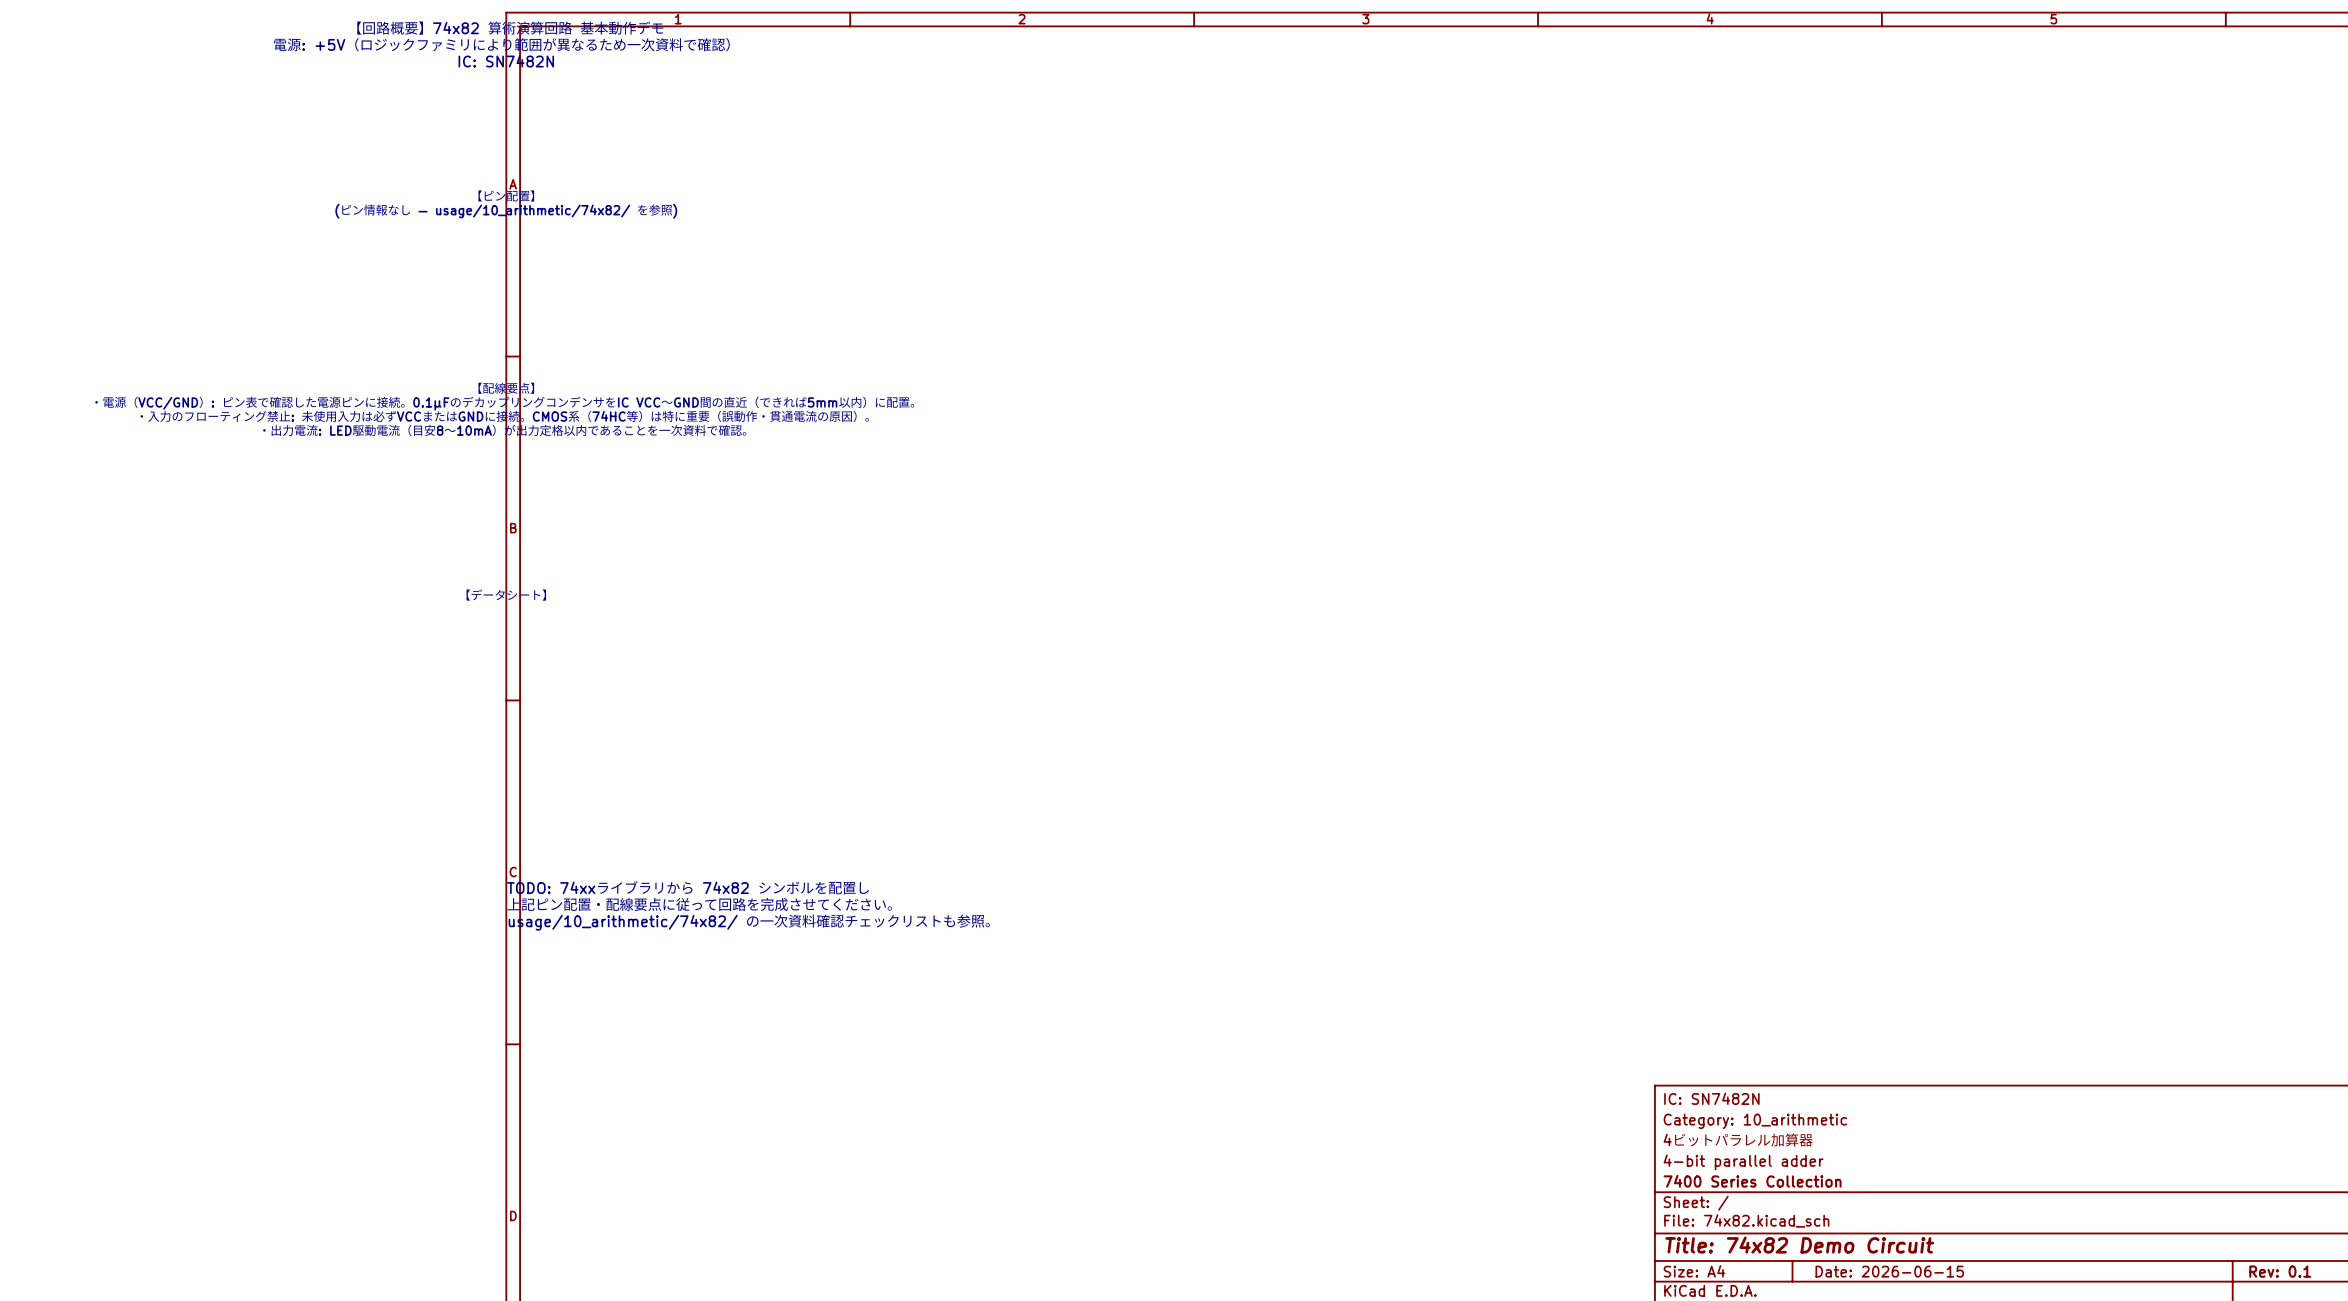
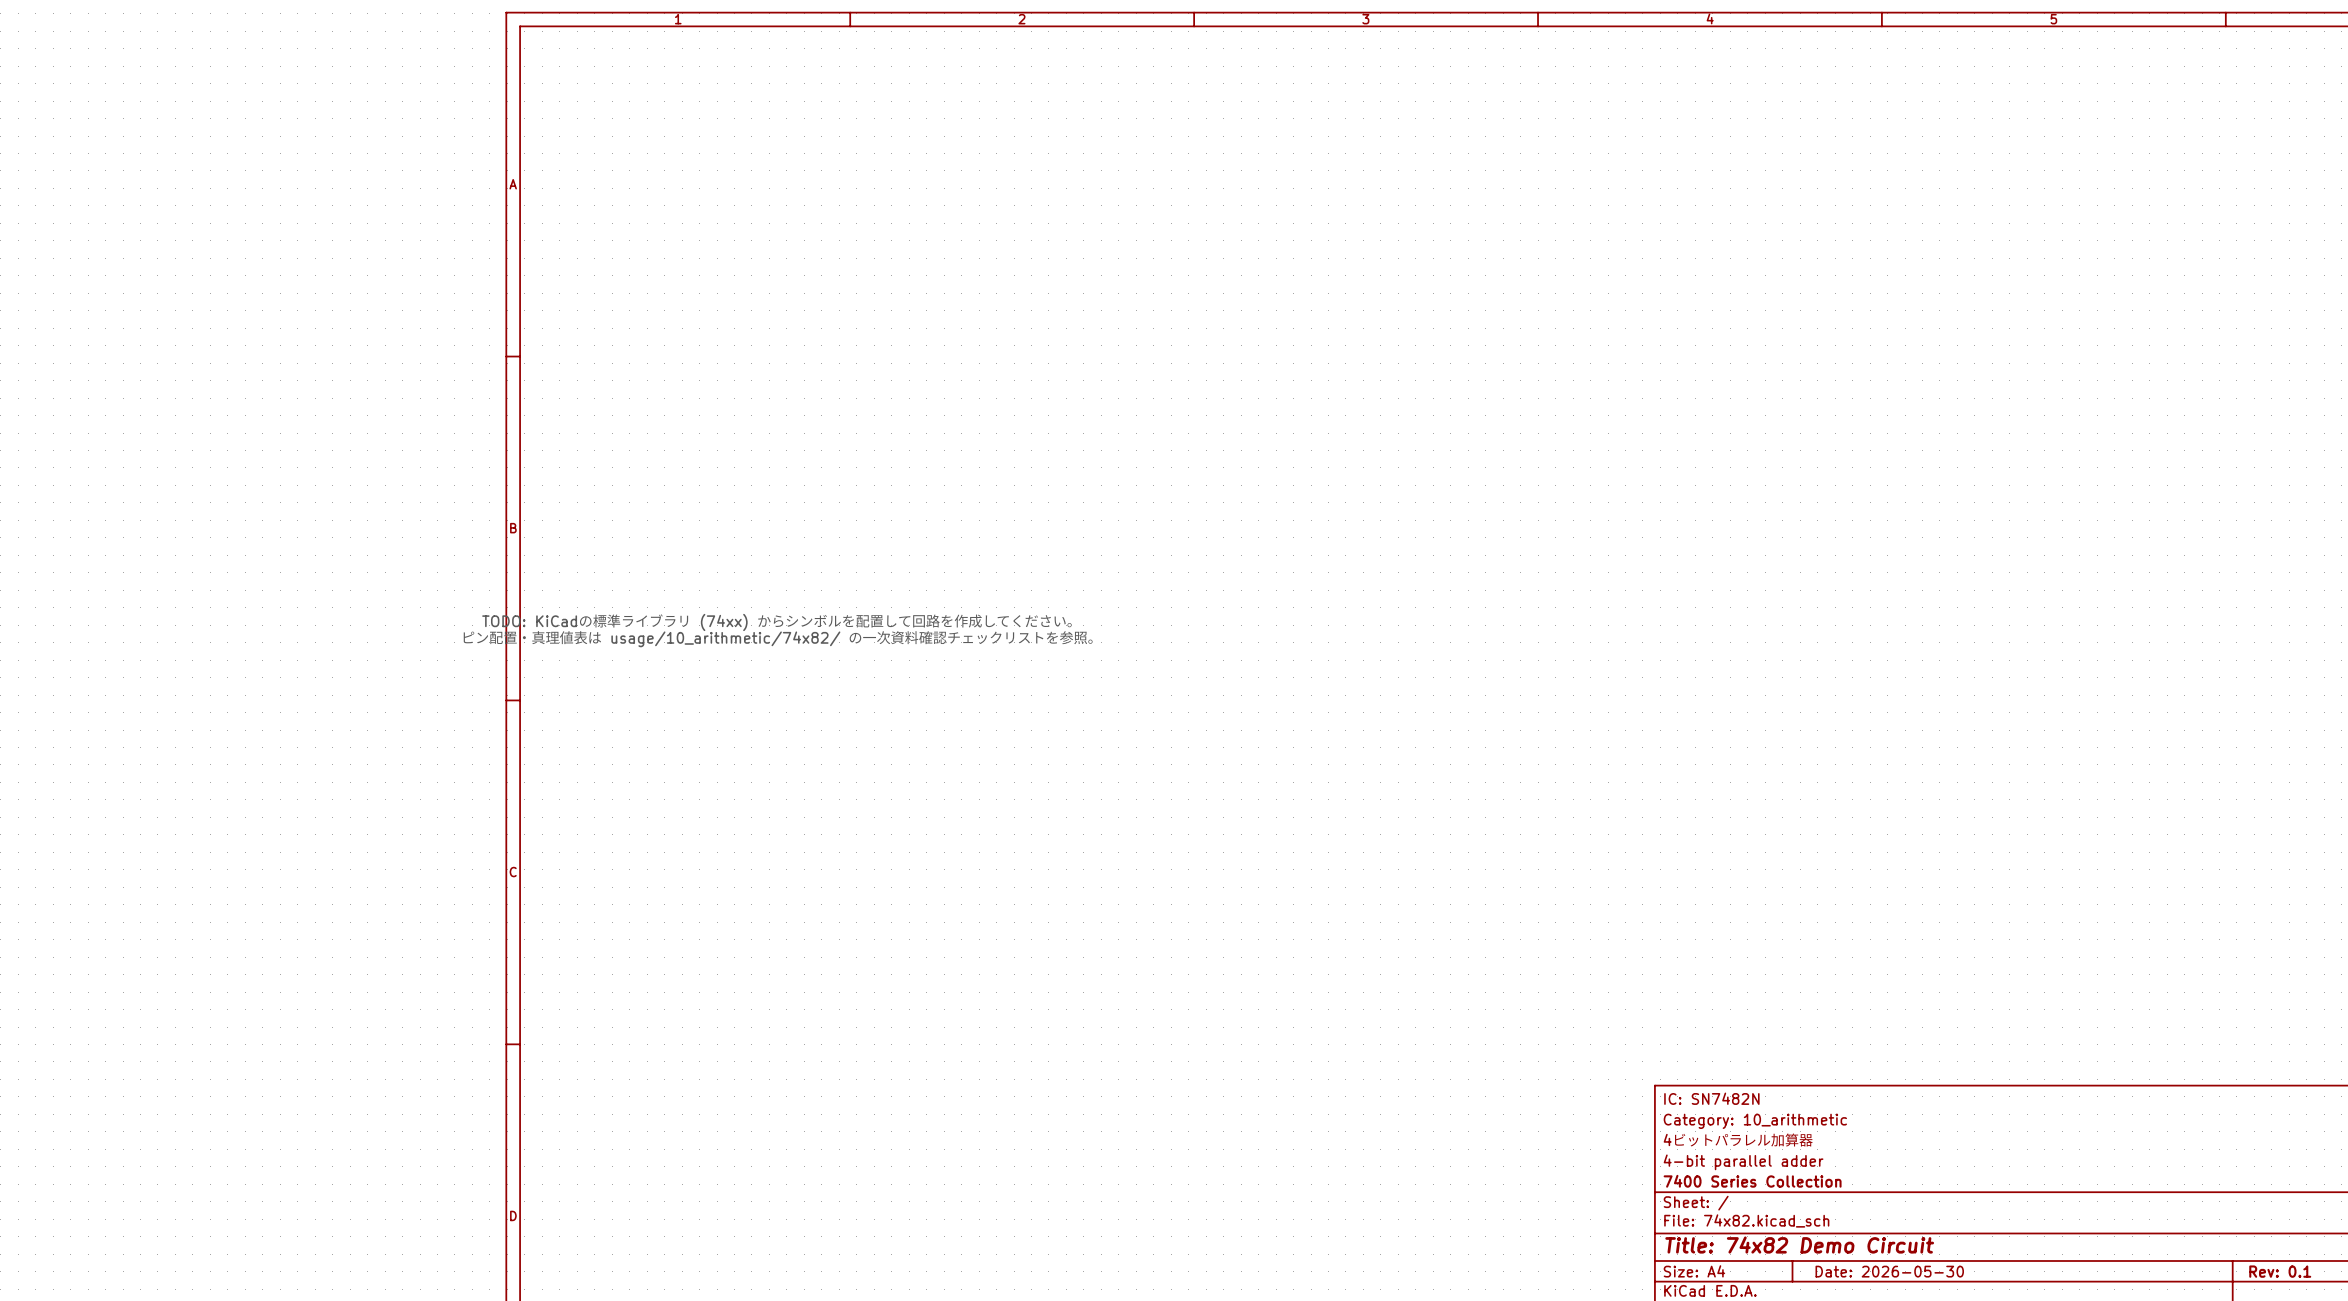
text: 【回路概要】74x82 算術演算回路 基本動作デモ (510, 28) -> none
text: 電源: +5V（ロジックファミリにより範囲が異なるため一次資料で確認） (501, 44) -> none
text: IC: SN7482N (506, 61) -> none
text: 【ピン配置】 (506, 195) -> none
text: (ピン情報なし — usage/10_arithmetic/74x82/ を参照) (506, 211) -> none
text: 【配線要点】 (506, 388) -> none
text: ・電源（VCC/GND）: ピン表で確認した電源ピンに接続。0.1µFのデカップリングコンデンサをIC VCC〜GND間の直近（できれば5mm以内）に配置。 (504, 403) -> none
text: ・入力のフローティング禁止: 未使用入力は必ずVCCまたはGNDに接続。CMOS系（74HC等）は特に重要（誤動作・貫通電流の原因）。 (504, 416) -> none
text: ・出力電流: LED駆動電流（目安8〜10mA）が出力定格以内であることを一次資料で確認。 (504, 430) -> none
text: 【データシート】 (506, 595) -> none
text: none -> TODO: KiCadの標準ライブラリ (74xx) からシンボルを配置して回路を作成してください。 (777, 622)
text: none -> ピン配置・真理値表は usage/10_arithmetic/74x82/ の一次資料確認チェックリストを参照。 (778, 638)
text: TODO: 74xxライブラリから 74x82 シンボルを配置し (688, 887) -> none
text: 上記ピン配置・配線要点に従って回路を完成させてください。 (699, 904) -> none
text: usage/10_arithmetic/74x82/ の一次資料確認チェックリストも参照。 (749, 922) -> none
title block: Date: 2026-06-15 (1889, 1271) -> Date: 2026-05-30 (1889, 1271)

